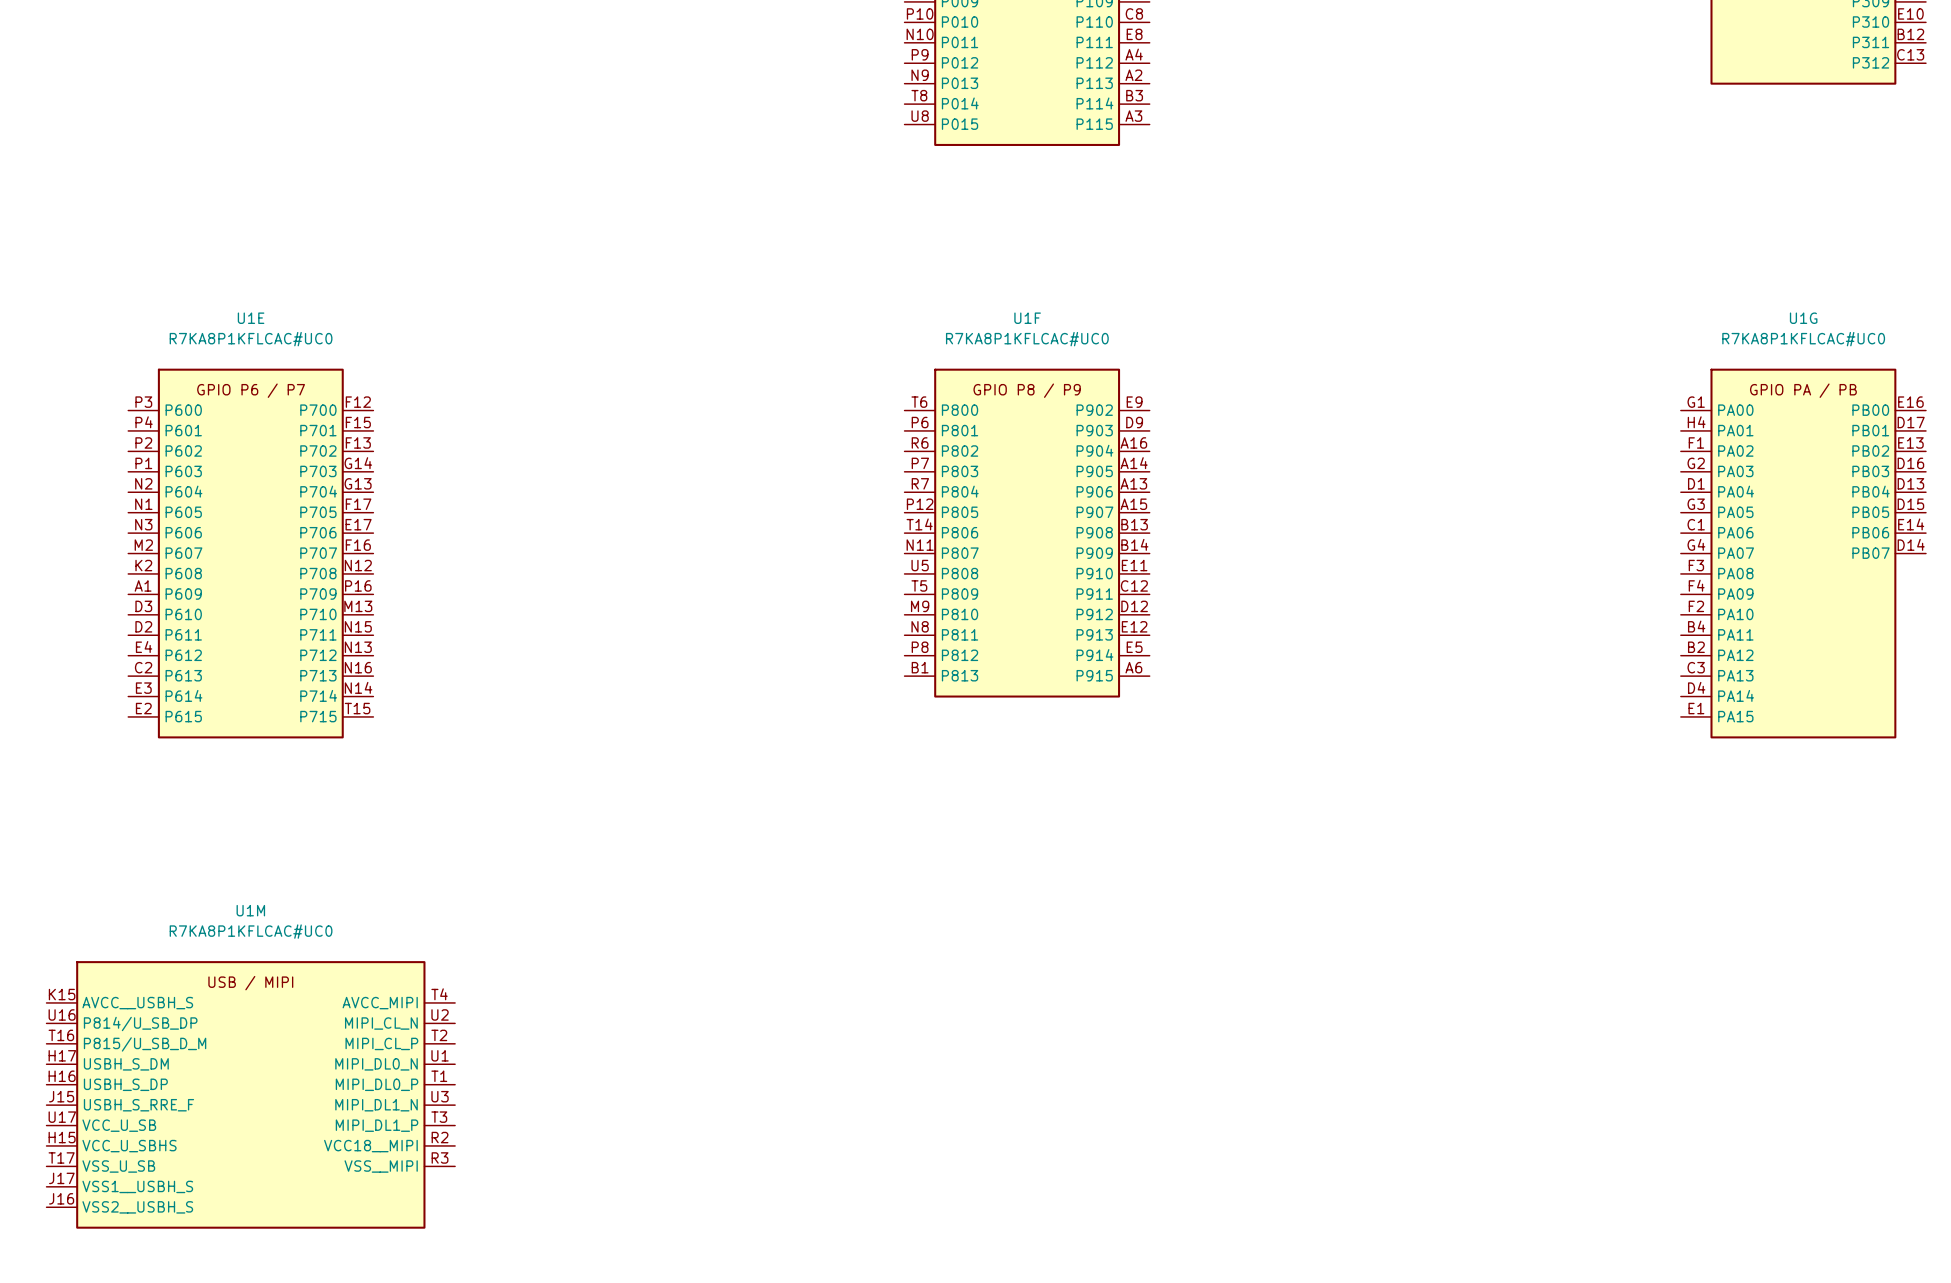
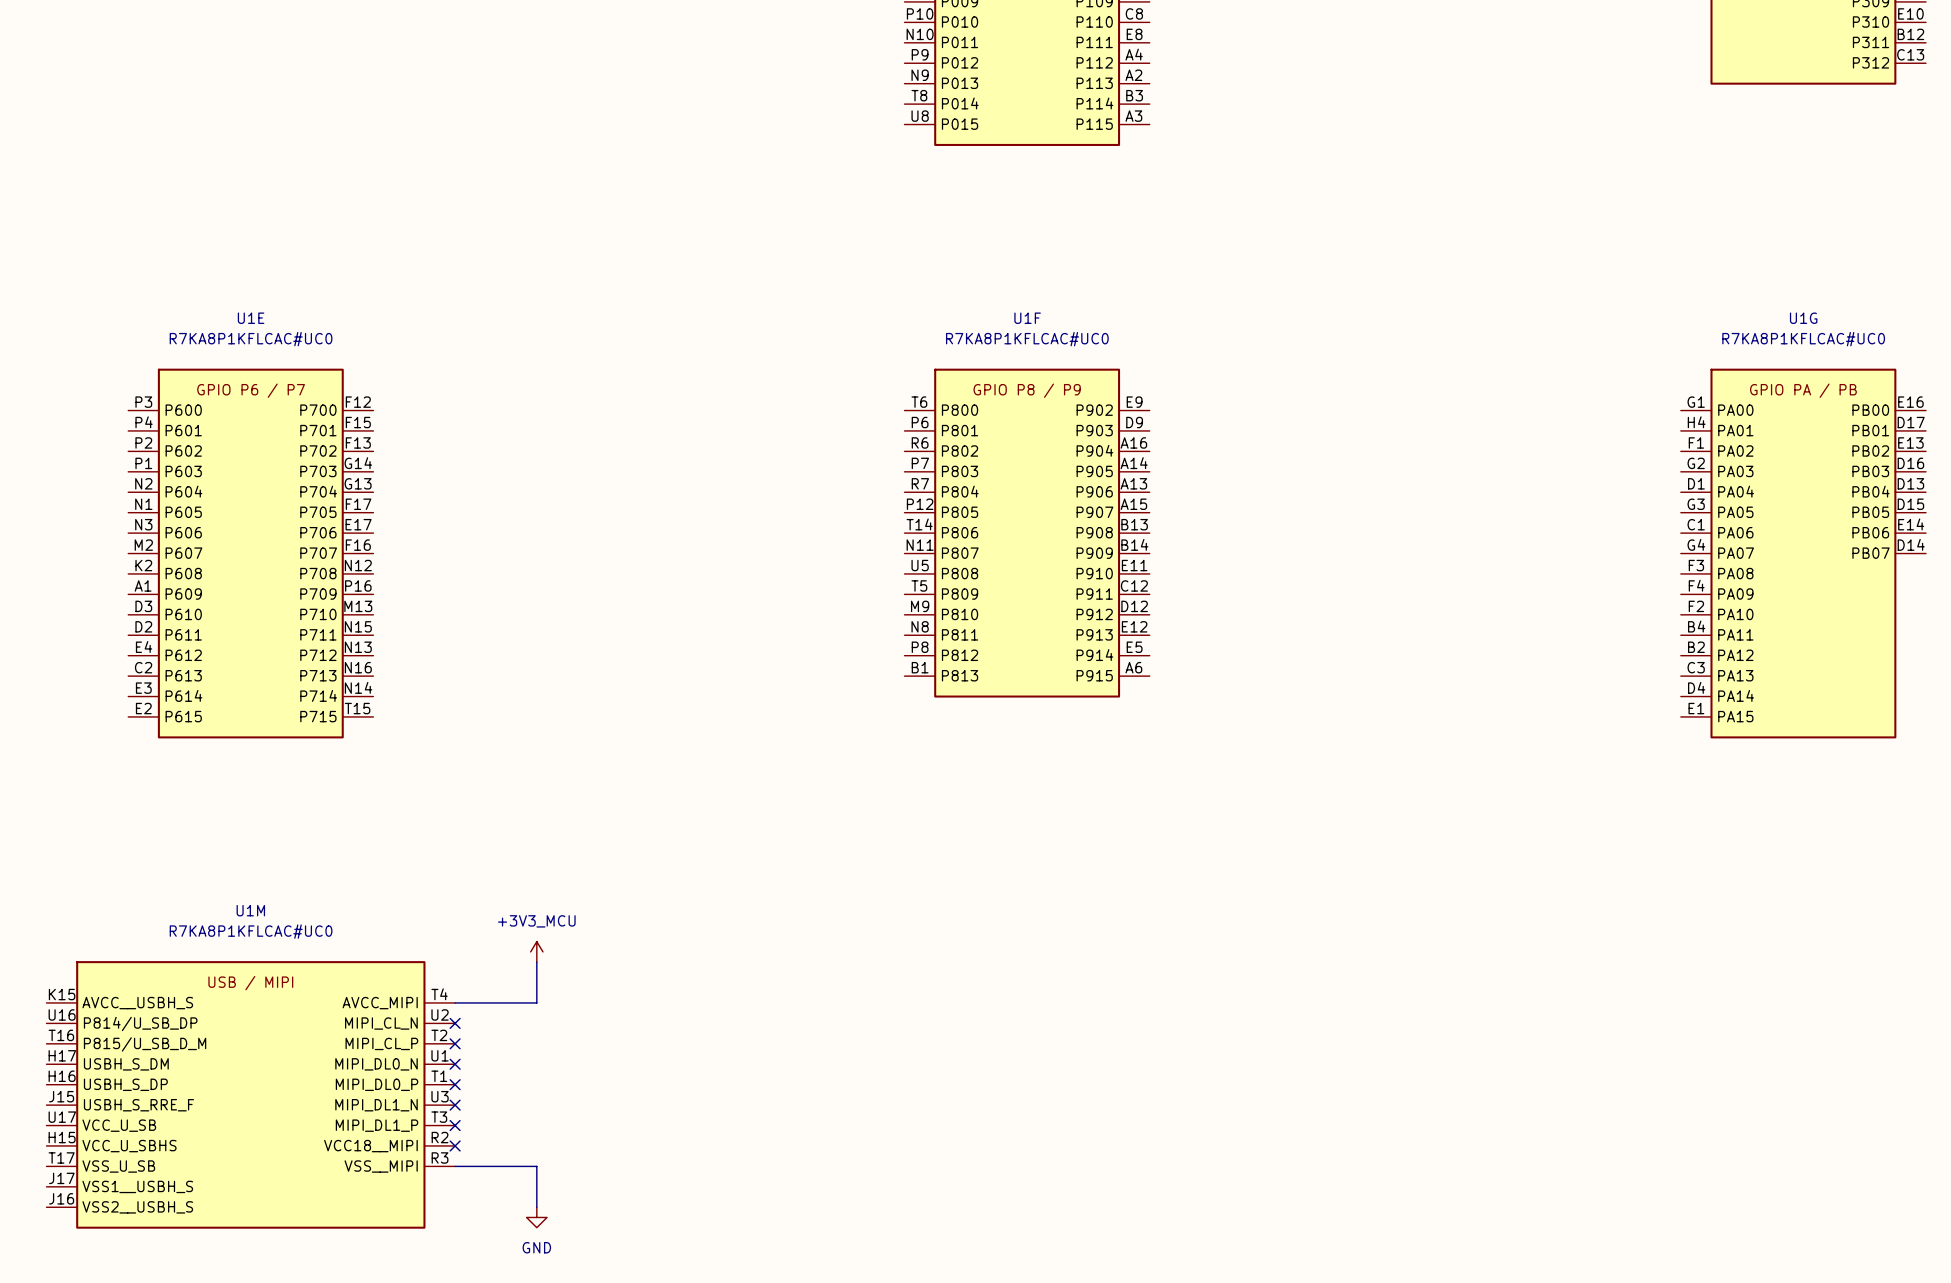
power symbol: none -> +3V3_MCU (536, 951)
wire: none -> (536, 962) (536, 1002) (455, 1002)
no-connect mark: none -> (455, 1023)
no-connect mark: none -> (455, 1043)
no-connect mark: none -> (455, 1064)
no-connect mark: none -> (455, 1084)
no-connect mark: none -> (455, 1105)
no-connect mark: none -> (455, 1125)
no-connect mark: none -> (455, 1145)
wire: none -> (455, 1166) (536, 1166) (536, 1207)
power symbol: none -> GND (536, 1217)

